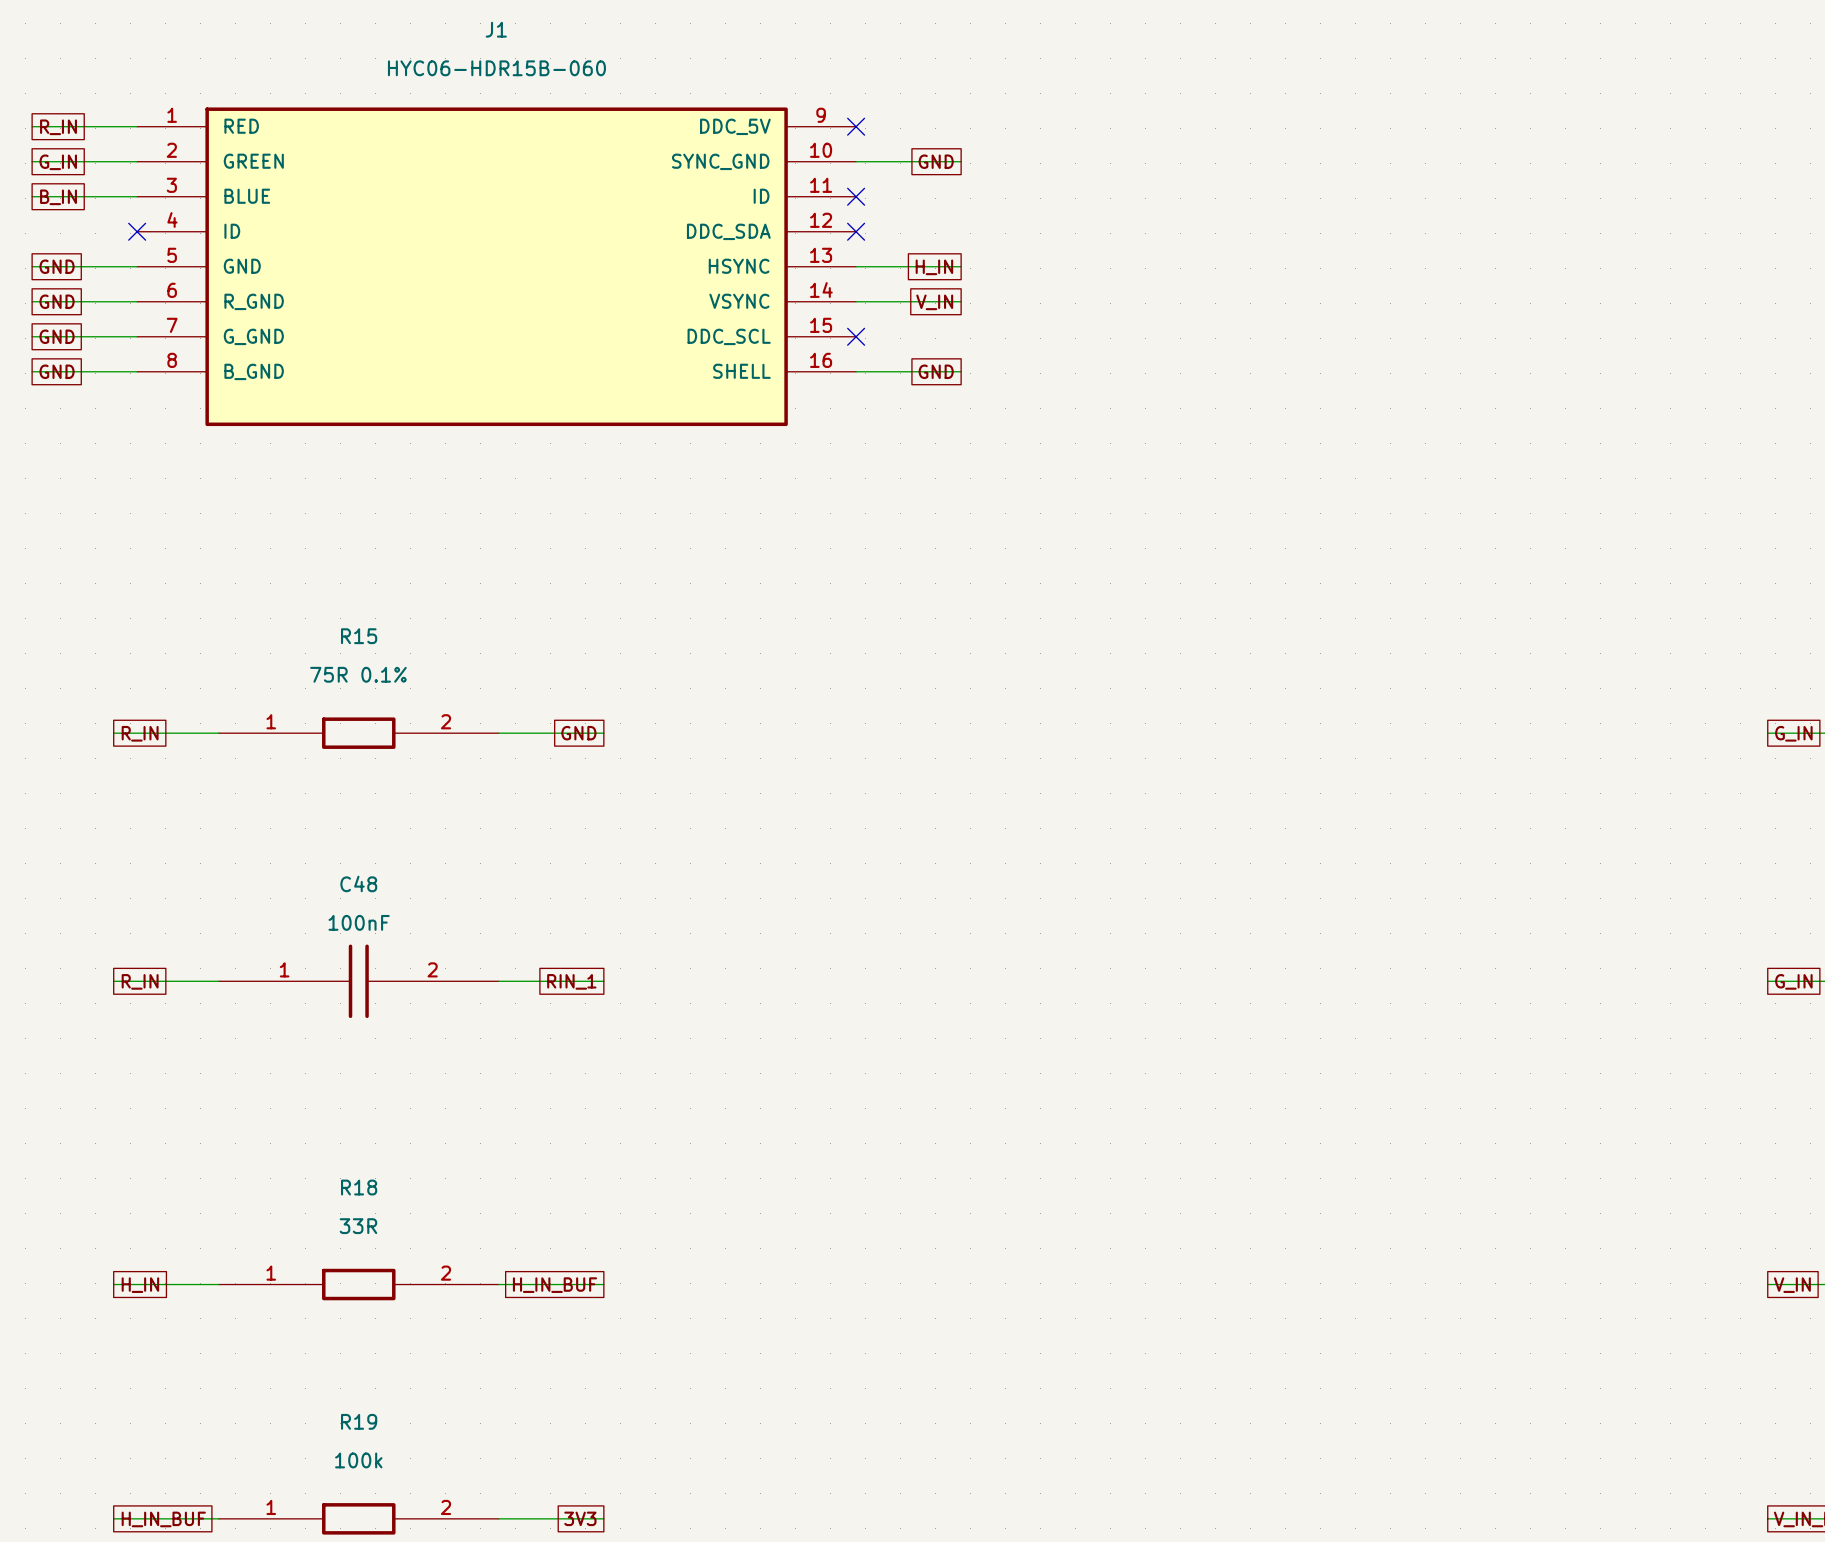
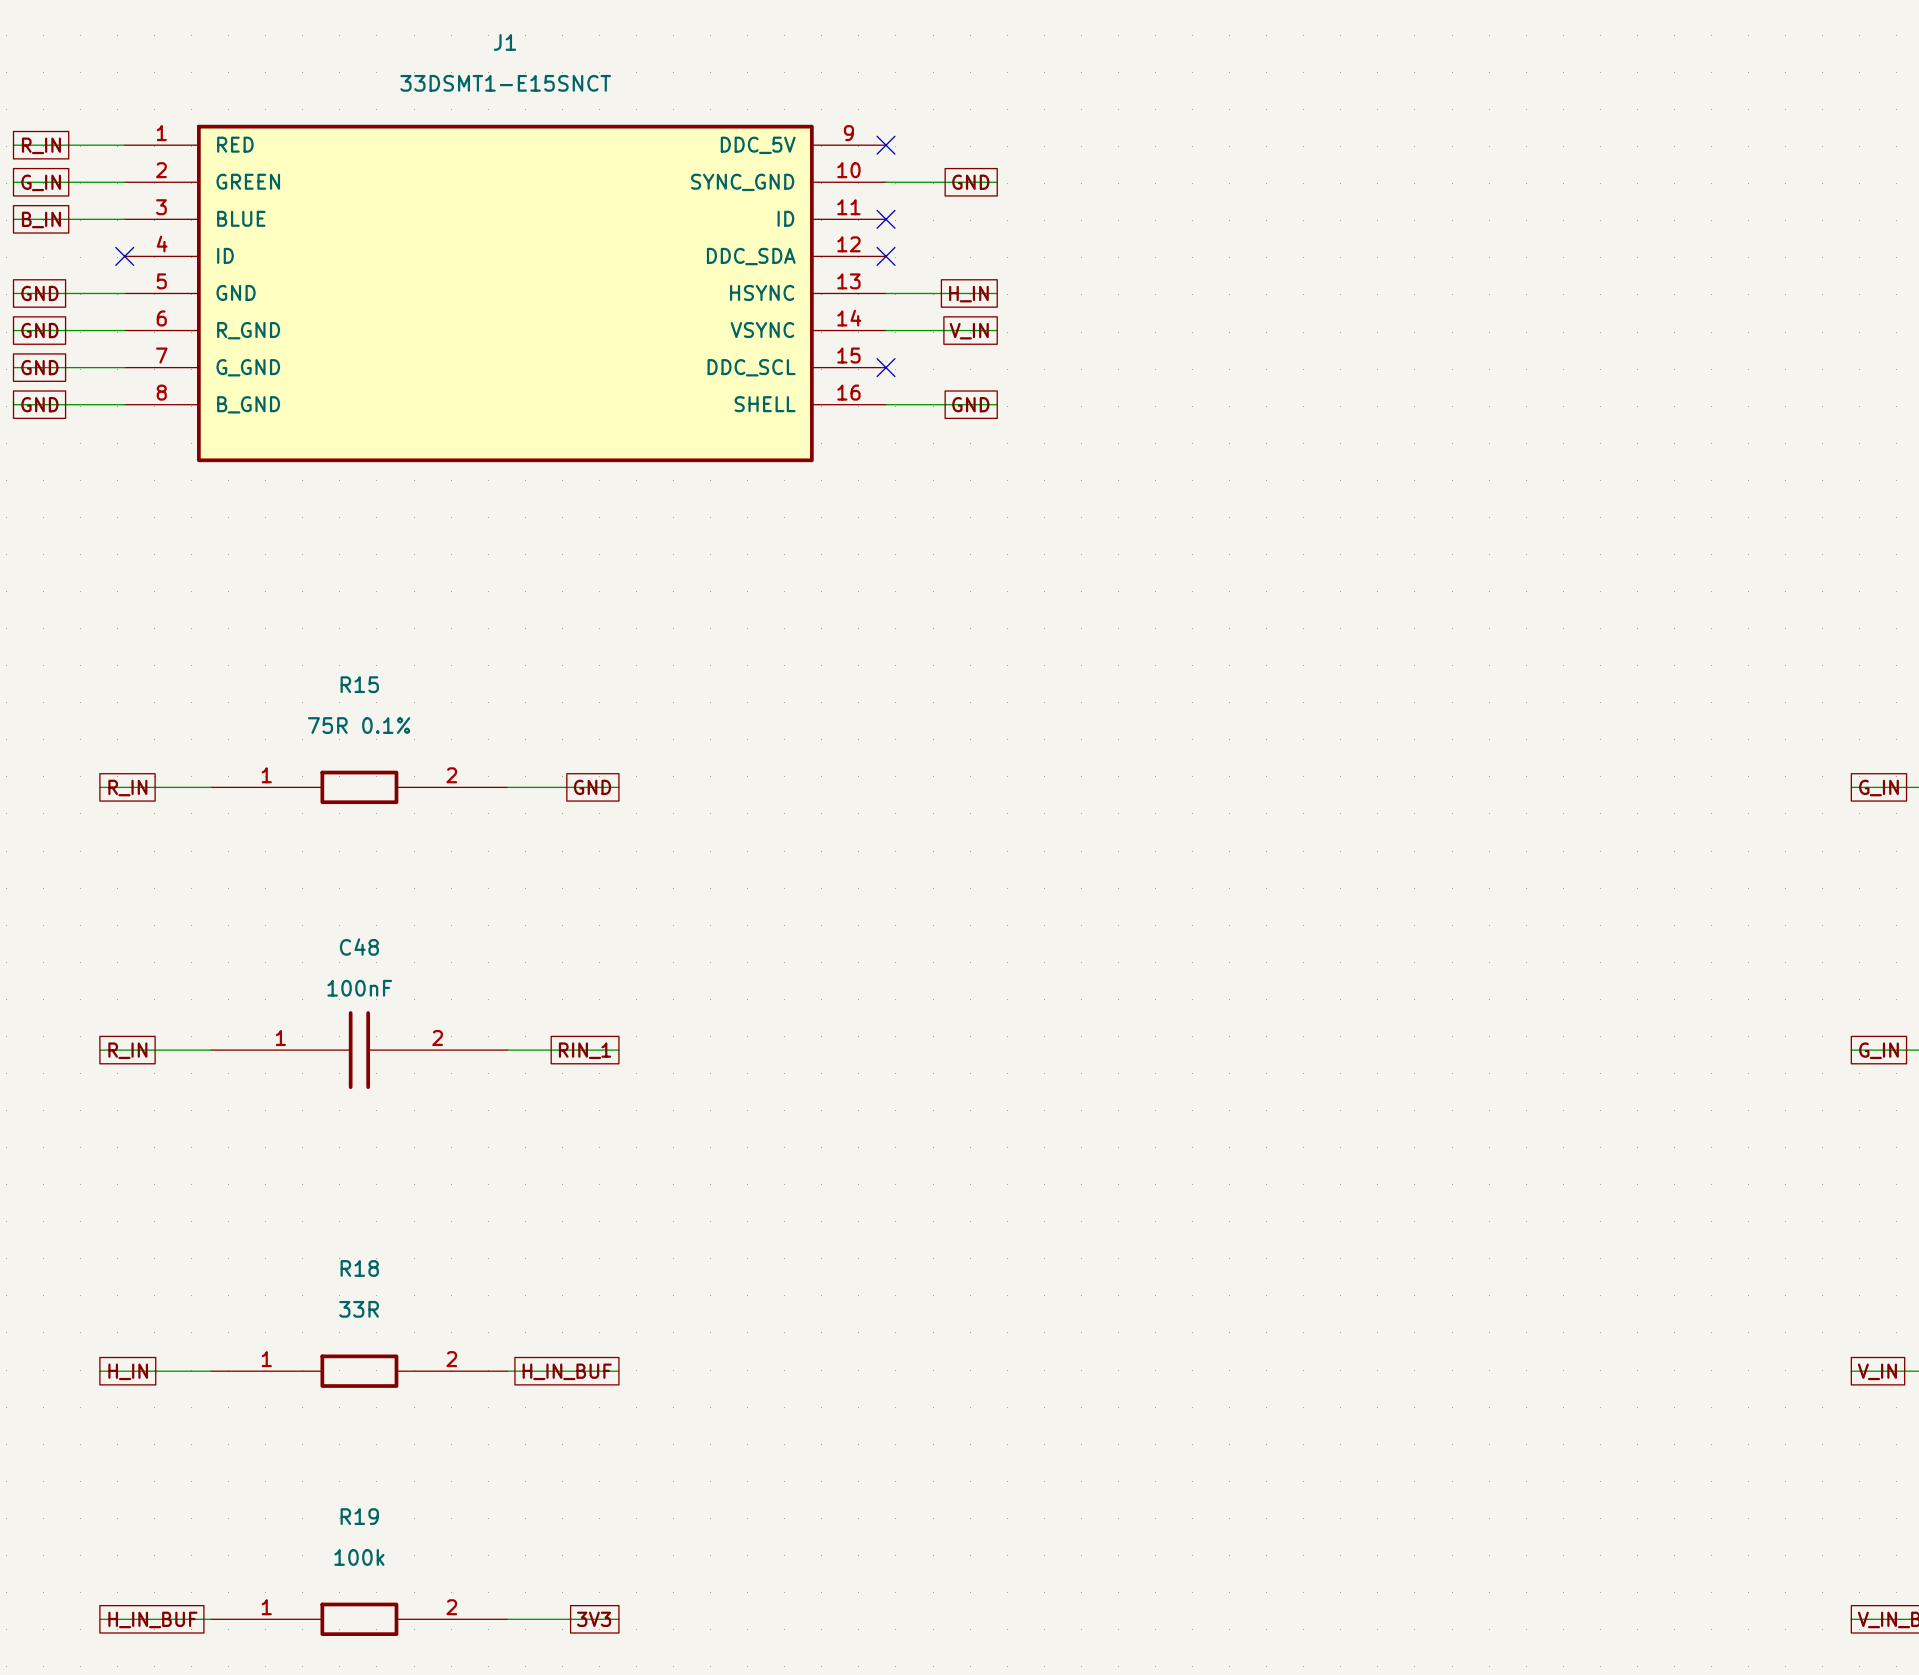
J1 value: HYC06-HDR15B-060 (496, 68) -> 33DSMT1-E15SNCT (505, 83)

